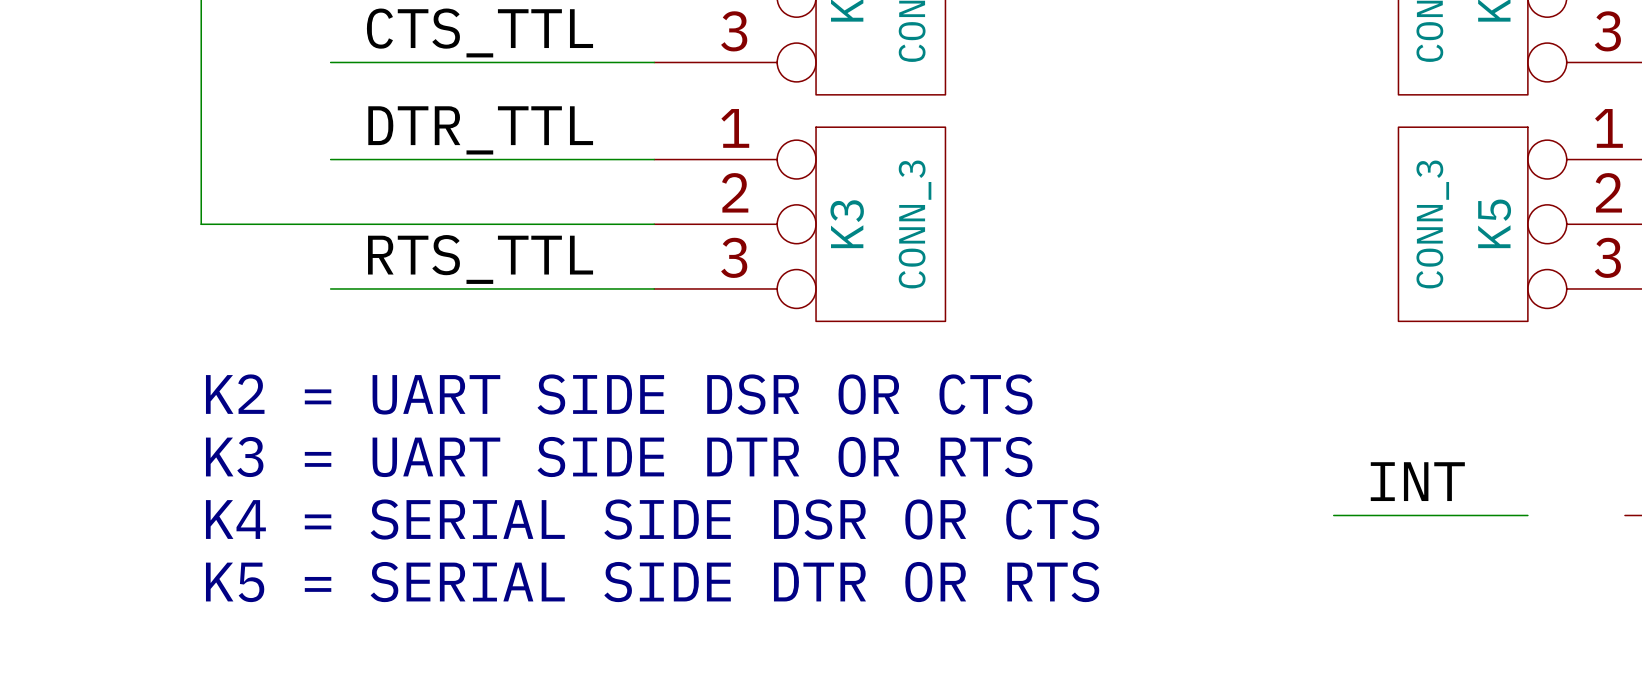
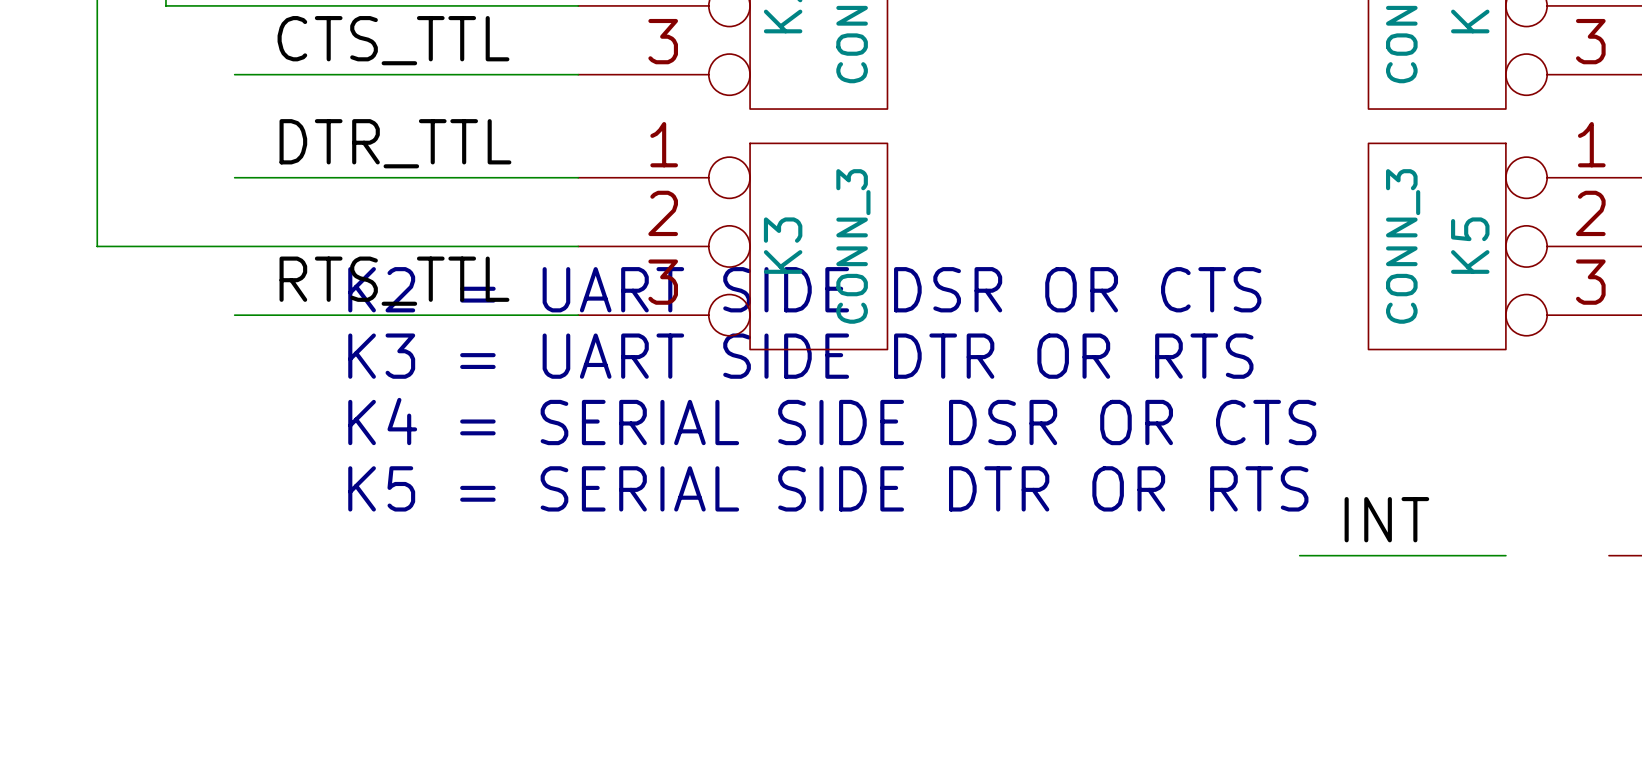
text position: K2 = UART SIDE DSR OR CTS (619, 394) -> K2 = UART SIDE DSR OR CTS (804, 289)
text position: K3 = UART SIDE DTR OR RTS (619, 456) -> K3 = UART SIDE DTR OR RTS (800, 356)
text position: K4 = SERIAL SIDE DSR OR CTS (652, 519) -> K4 = SERIAL SIDE DSR OR CTS (832, 421)
text position: K5 = SERIAL SIDE DTR OR RTS (652, 582) -> K5 = SERIAL SIDE DTR OR RTS (828, 488)

